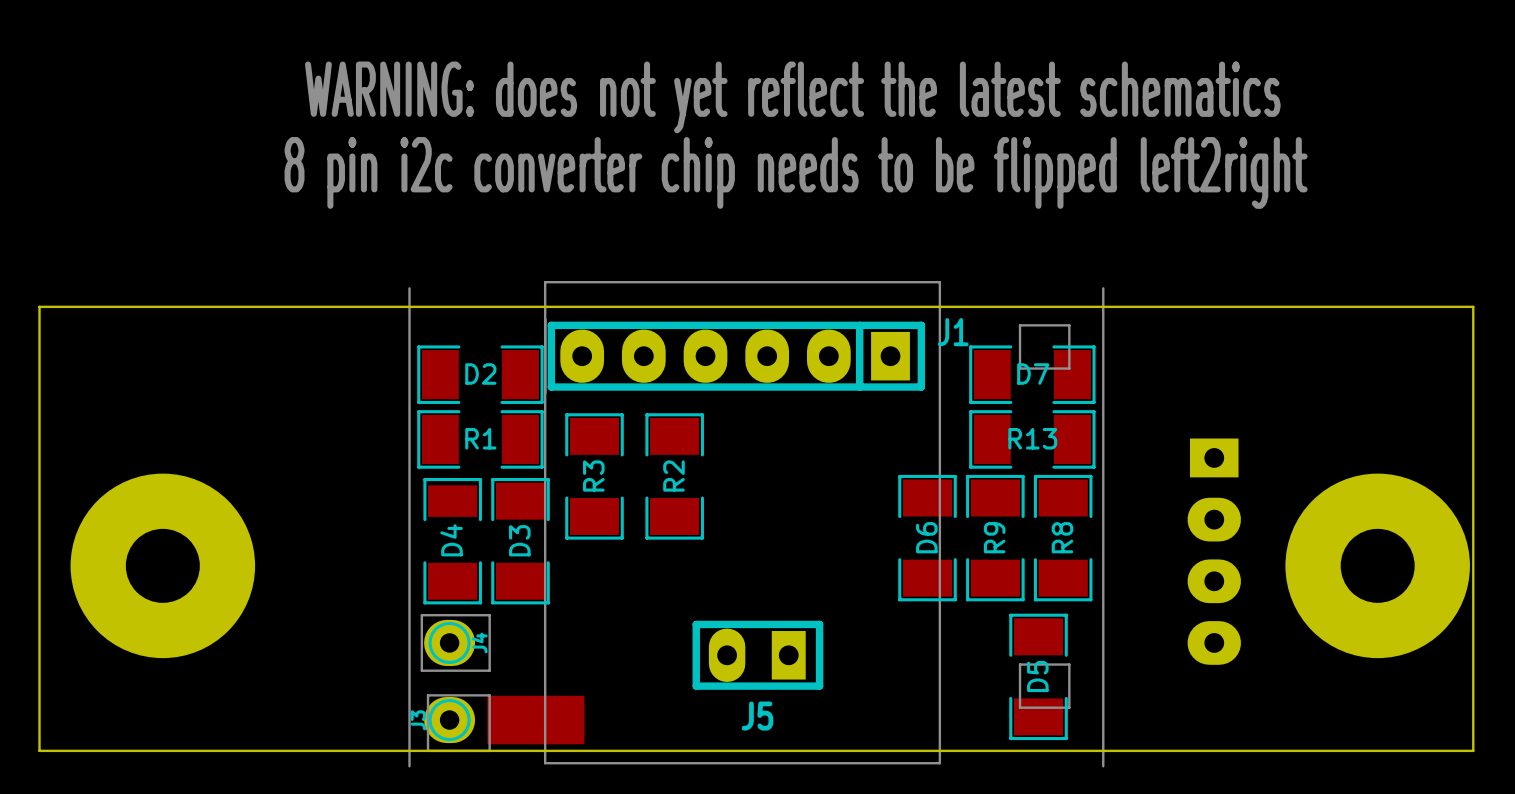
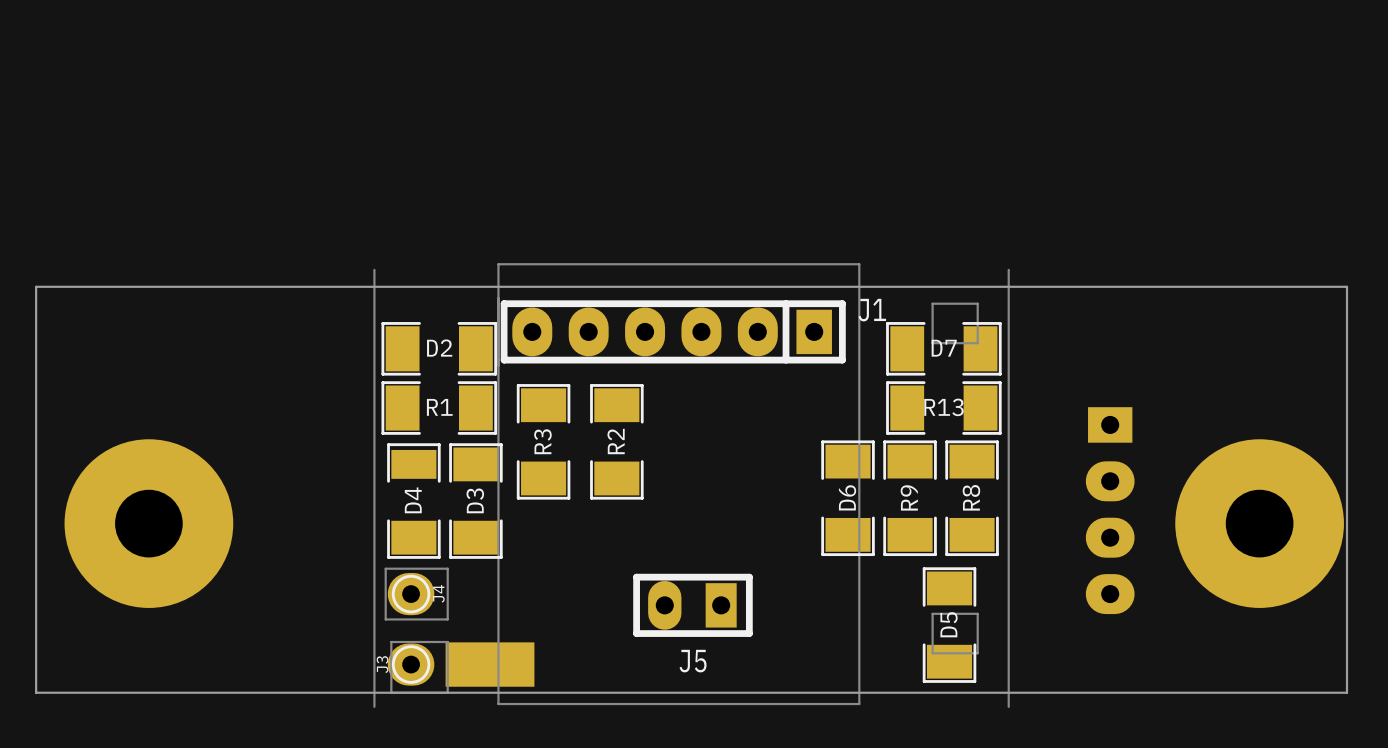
text: WARNING: does not yet reflect the latest schematics (792, 97) -> none
text: 8 pin i2c converter chip needs to be flipped left2right (796, 172) -> none

